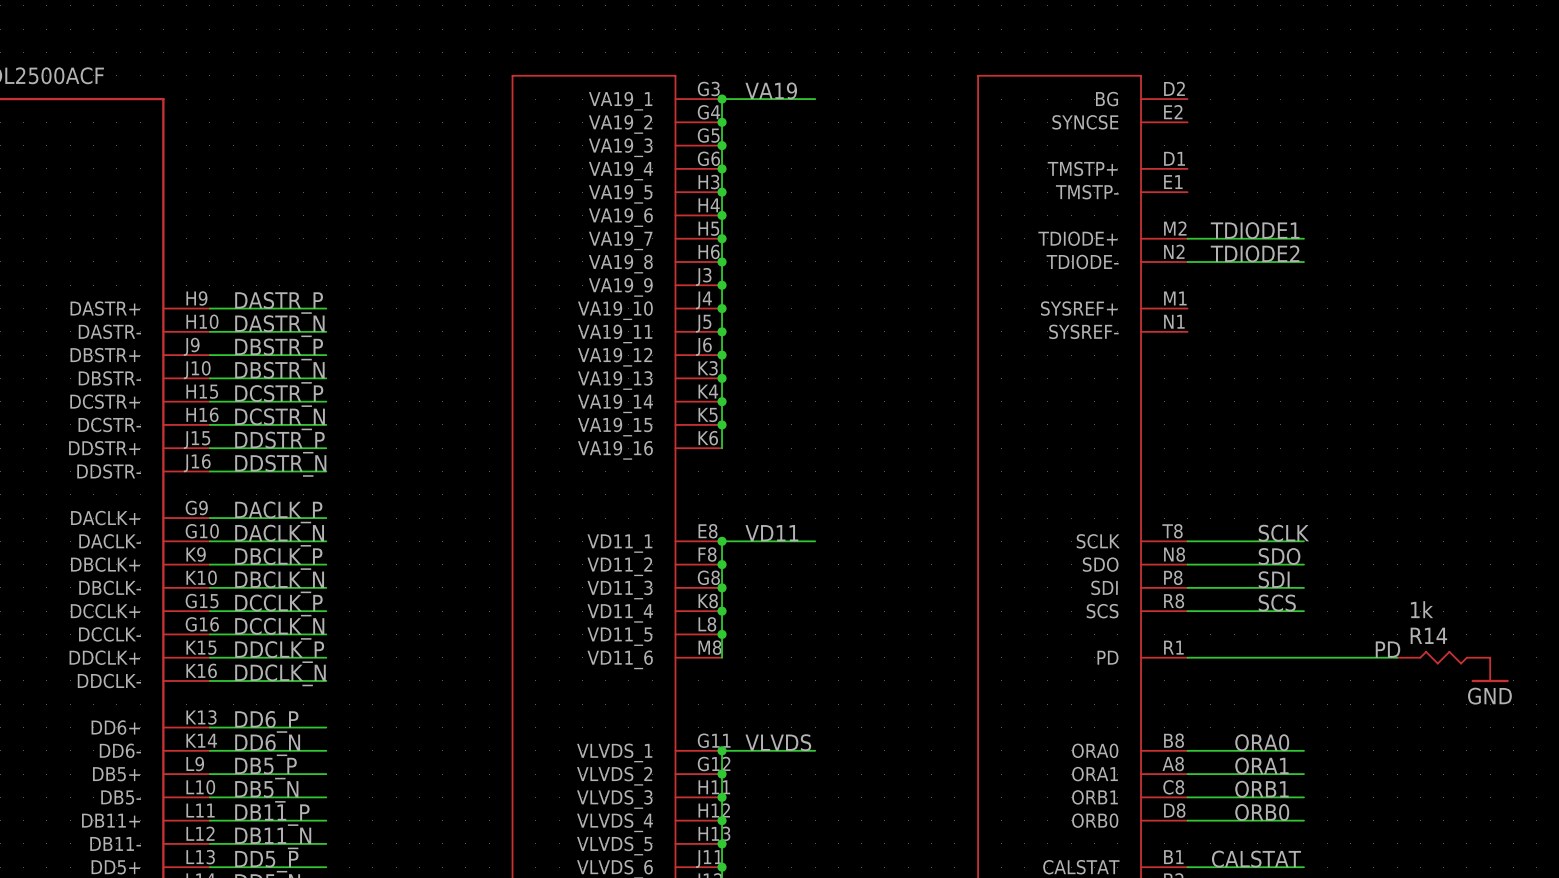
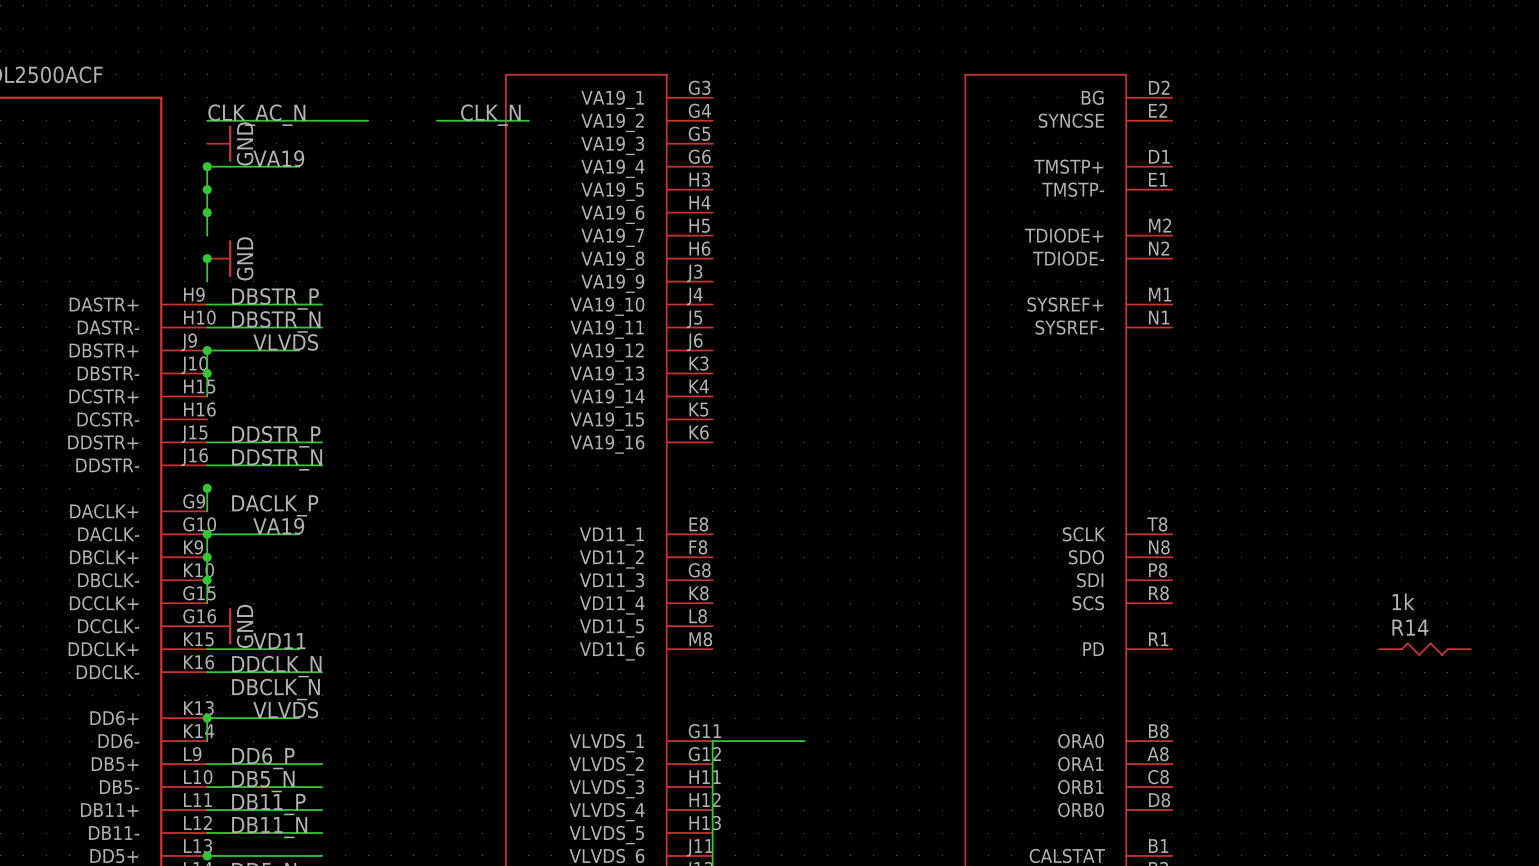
label: VA19 (771, 90) -> none
junction: (722, 99) -> none
wire: (815, 99) (722, 99) (722, 448) -> none
label: none -> CLK_AC_N (256, 115)
label: none -> CLK_N (490, 115)
wire: none -> (207, 120) (368, 120)
wire: none -> (436, 120) (528, 120)
junction: (722, 122) -> none
power symbol: none -> GND (219, 143)
junction: (722, 145) -> none
label: none -> VA19 (278, 158)
junction: none -> (207, 166)
wire: none -> (299, 166) (207, 166) (207, 235)
junction: (722, 168) -> none
junction: none -> (207, 189)
junction: (722, 192) -> none
junction: none -> (207, 212)
junction: (722, 215) -> none
label: TDIODE1 (1255, 230) -> none
junction: (722, 238) -> none
wire: (1187, 238) (1303, 238) -> none
label: TDIODE2 (1255, 253) -> none
wire: none -> (207, 258) (207, 281)
junction: none -> (207, 258)
power symbol: none -> GND (219, 258)
junction: (722, 261) -> none
wire: (1187, 261) (1303, 261) -> none
junction: (722, 285) -> none
label: DASTR_P (279, 302) -> DBSTR_P (275, 298)
junction: (722, 308) -> none
label: DASTR_N (279, 326) -> DBSTR_N (276, 321)
junction: (722, 331) -> none
label: none -> VLVDS (285, 342)
label: DBSTR_P (279, 349) -> none
junction: none -> (207, 350)
wire: (303, 355) (326, 355) -> none
junction: (722, 355) -> none
label: DBSTR_N (279, 372) -> none
wire: (209, 378) (326, 378) -> none
junction: none -> (207, 373)
junction: (722, 378) -> none
label: DCSTR_P (279, 396) -> none
wire: (209, 401) (326, 401) -> (207, 396) (207, 350)
junction: (722, 401) -> none
label: DCSTR_N (280, 419) -> none
wire: (209, 424) (326, 424) -> none
junction: (722, 424) -> none
junction: none -> (207, 488)
wire: (209, 518) (326, 518) -> (207, 511) (207, 488)
label: none -> VA19 (278, 526)
label: VD11 (771, 533) -> none
label: SCLK (1283, 533) -> none
label: DACLK_N (279, 535) -> none
junction: none -> (207, 534)
wire: (303, 541) (326, 541) -> none
junction: (722, 541) -> none
wire: (815, 541) (722, 541) (722, 657) -> none
wire: (1187, 541) (1303, 541) -> none
label: SDO (1279, 556) -> none
label: DBCLK_P (278, 558) -> none
wire: (209, 564) (326, 564) -> none
junction: none -> (207, 557)
junction: (722, 564) -> none
wire: (1187, 564) (1303, 564) -> none
label: SDI (1274, 579) -> none
label position: DBCLK_N (279, 582) -> DBCLK_N (275, 689)
wire: (209, 587) (326, 587) -> none
junction: none -> (207, 580)
junction: (722, 587) -> none
wire: (1187, 587) (1303, 587) -> none
label: SCS (1277, 603) -> none
label: DCCLK_P (278, 605) -> none
wire: (209, 611) (326, 611) -> (207, 603) (207, 534)
junction: (722, 611) -> none
wire: (1187, 611) (1303, 611) -> none
label: DCCLK_N (279, 628) -> none
wire: (209, 634) (326, 634) -> none
power symbol: none -> GND (219, 626)
junction: (722, 634) -> none
label: none -> VD11 (279, 641)
label: PD (1387, 649) -> none
label: DDCLK_P (279, 652) -> none
wire: (303, 657) (326, 657) -> none
wire: (1187, 657) (1397, 657) -> none
power symbol: GND (1490, 669) -> none
label: none -> VLVDS (285, 710)
label: DD6_P (266, 721) -> none
junction: none -> (207, 718)
wire: (303, 727) (326, 727) -> none
label: VLVDS (778, 742) -> none
label: ORA0 (1262, 742) -> none
label: DD6_N (267, 745) -> none
wire: (209, 750) (326, 750) -> (207, 741) (207, 718)
junction: (722, 750) -> none
wire: (1187, 750) (1303, 750) -> none
label: ORA1 (1261, 765) -> none
label: DB5_P (265, 768) -> DD6_P (263, 758)
junction: (722, 774) -> none
wire: (1187, 774) (1303, 774) -> none
label: ORB1 (1261, 789) -> none
junction: (722, 797) -> none
wire: (1187, 797) (1303, 797) -> none
label: ORB0 (1262, 812) -> none
junction: (722, 820) -> none
wire: (1187, 820) (1303, 820) -> none
junction: (722, 843) -> none
label: CALSTAT (1256, 859) -> none
label: DD5_P (266, 861) -> none
junction: none -> (207, 855)
junction: (722, 867) -> none
wire: (1187, 867) (1303, 867) -> none

